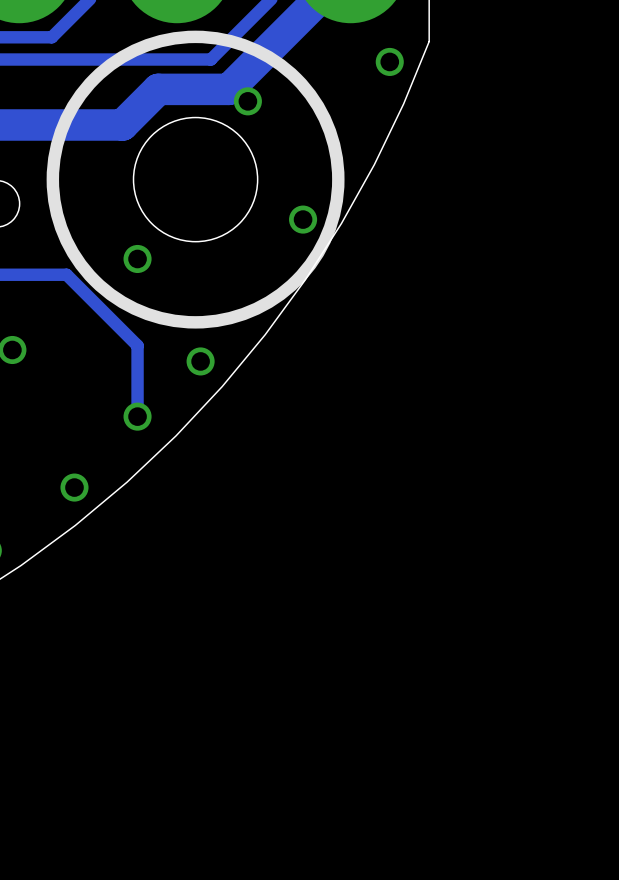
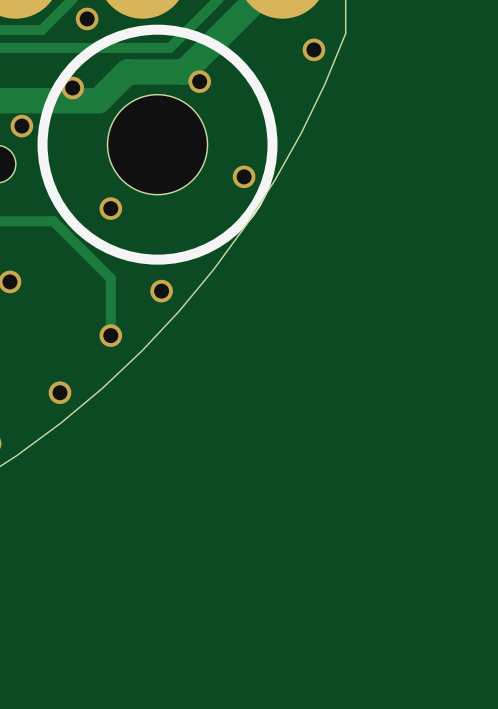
via: none -> (87, 18)
via: none -> (72, 87)
via: none -> (21, 126)

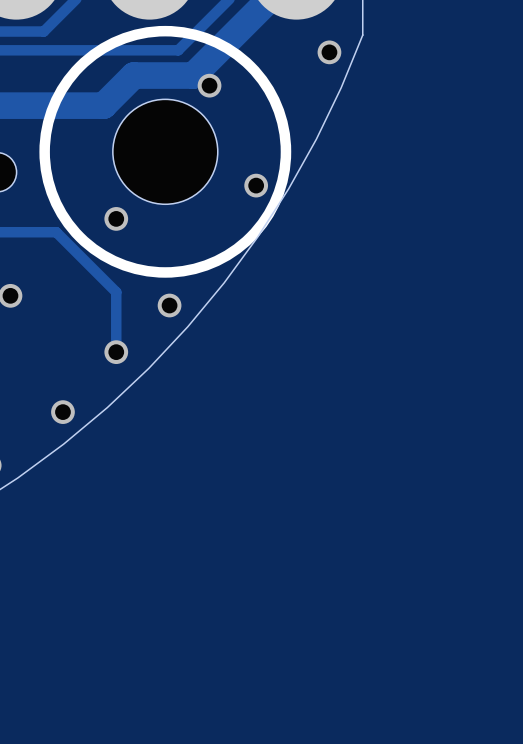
via: (87, 18) -> none
via: (72, 87) -> none
via: (21, 126) -> none

